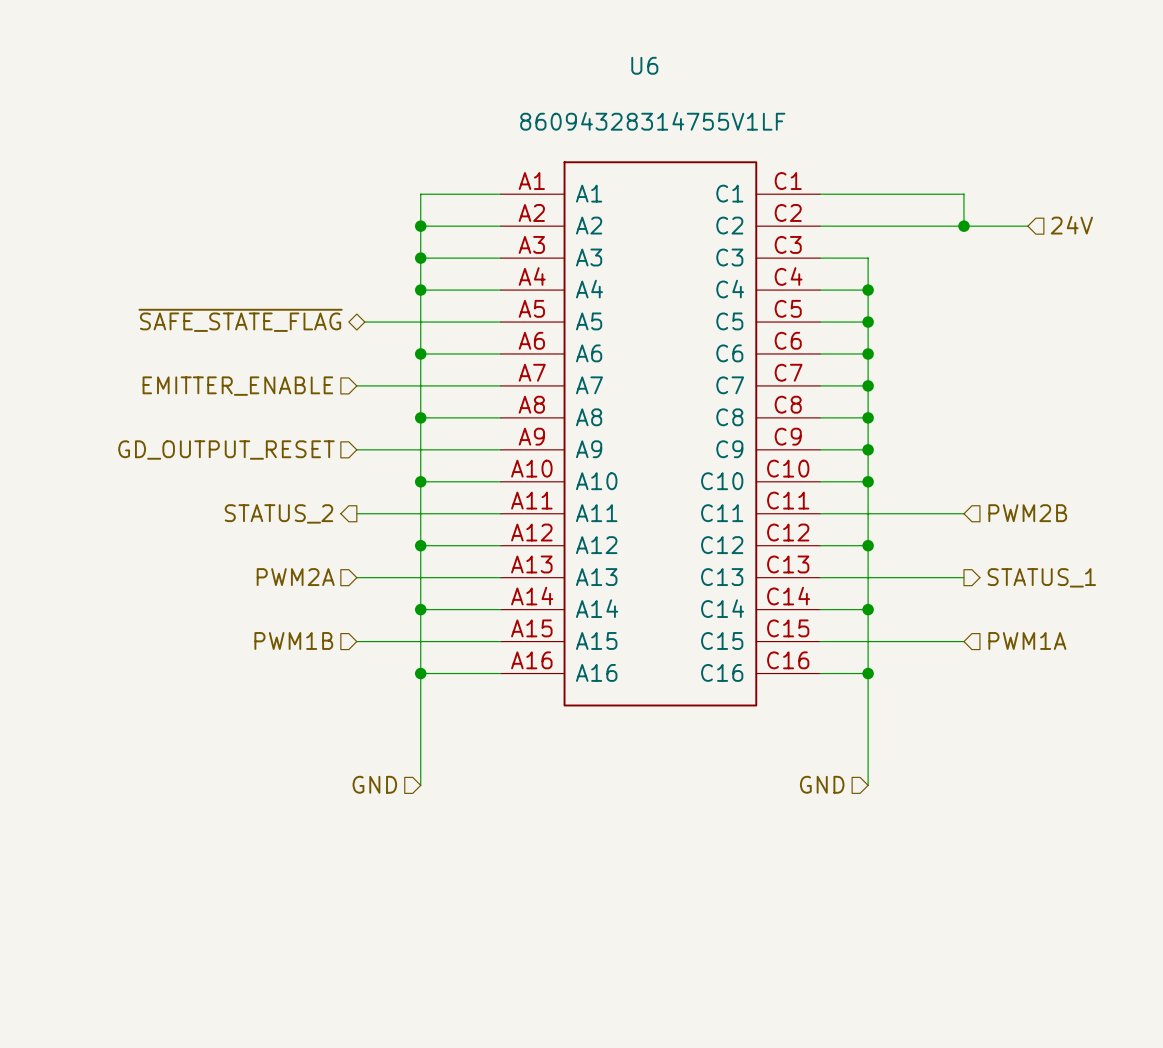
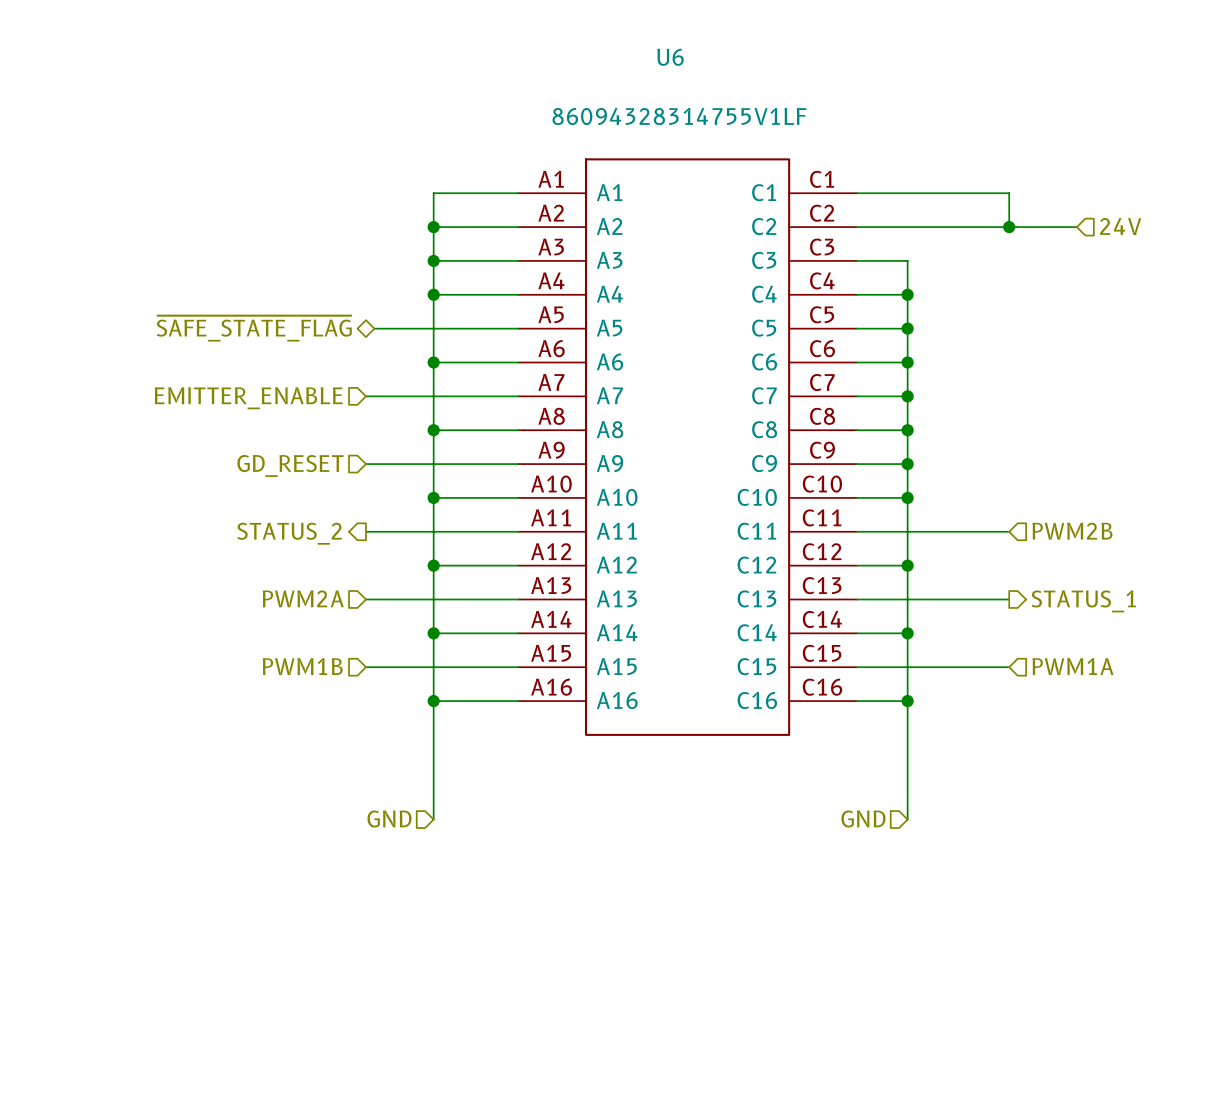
hierarchical label: GD_OUTPUT_RESET (226, 450) -> GD_RESET (290, 465)

